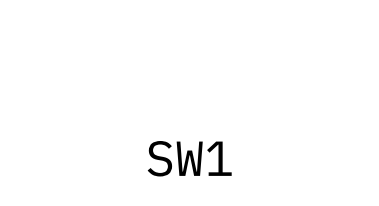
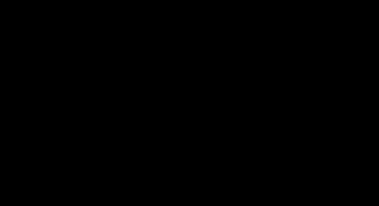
SW1: (189, 158) -> none

